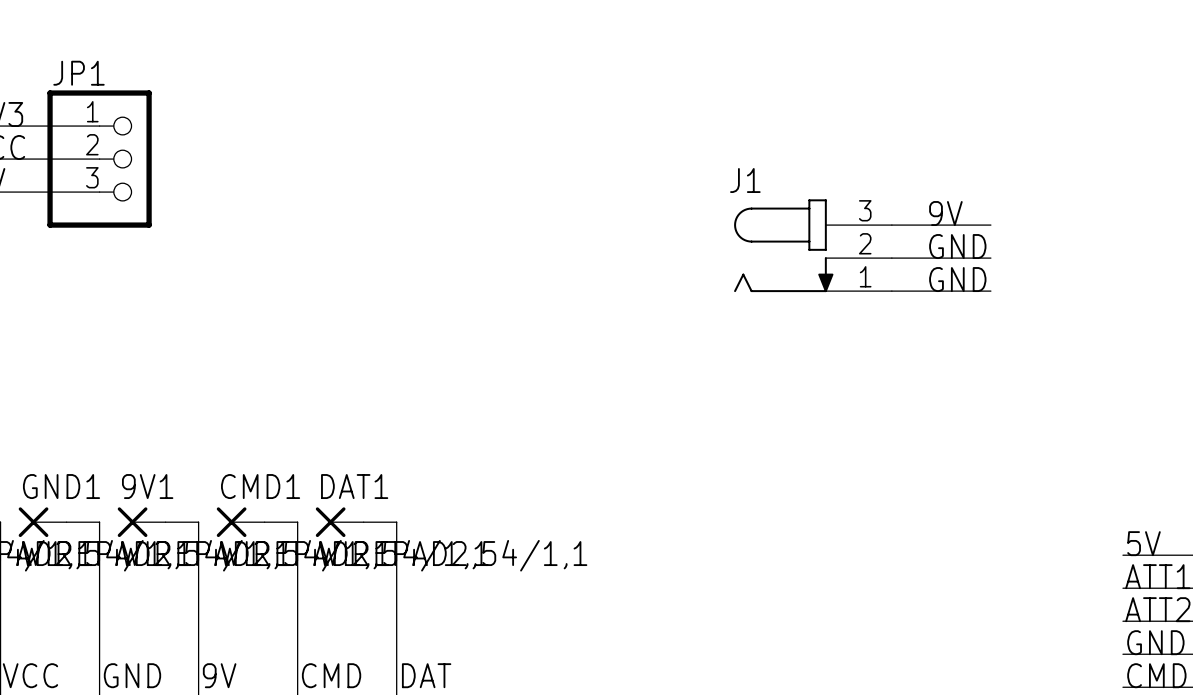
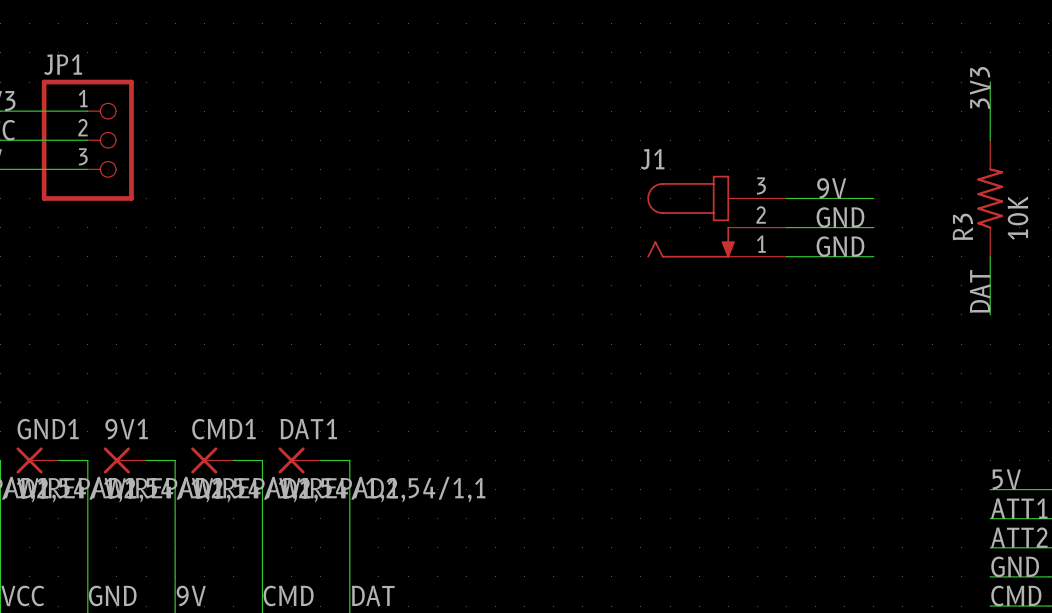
wire: none -> (990, 82) (990, 140)
label: none -> 3V3 (980, 87)
R3: none -> 10K (990, 198)
wire: none -> (990, 256) (990, 314)
label: none -> DAT (980, 291)

